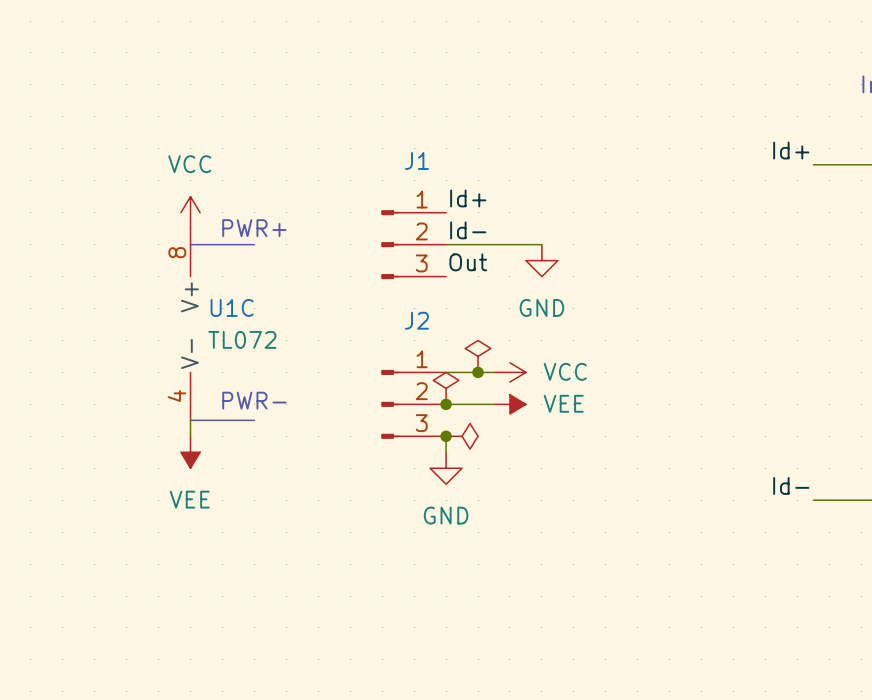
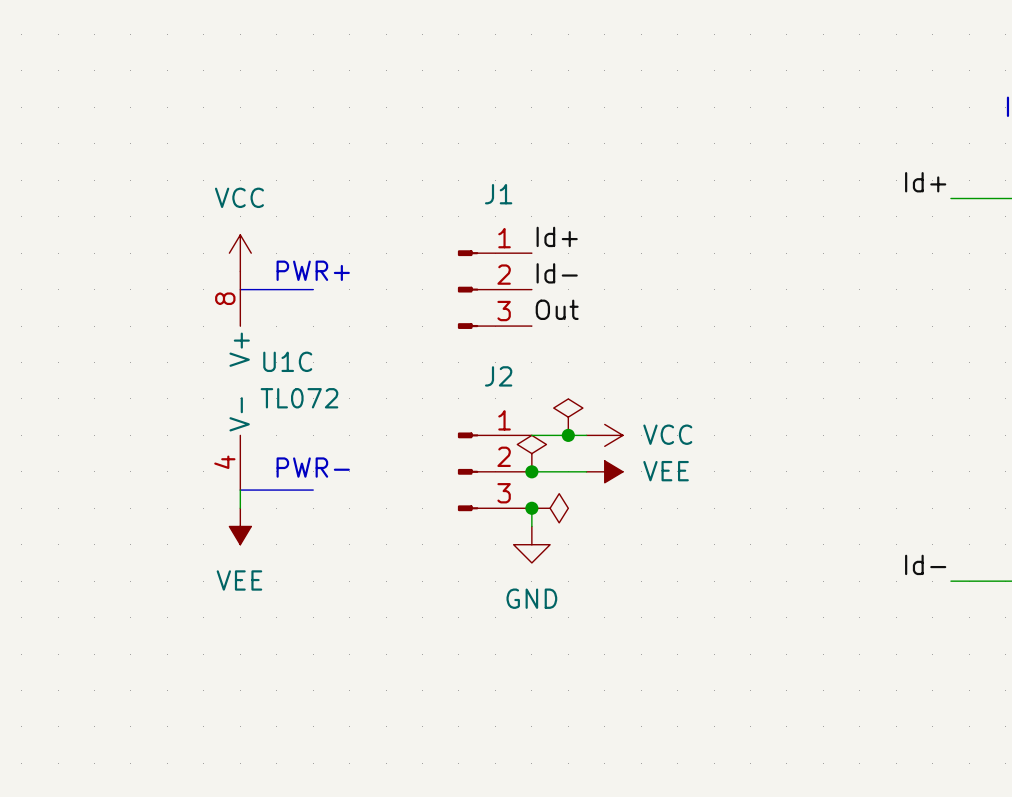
wire: (446, 244) (541, 244) -> none
power symbol: GND (541, 260) -> none

